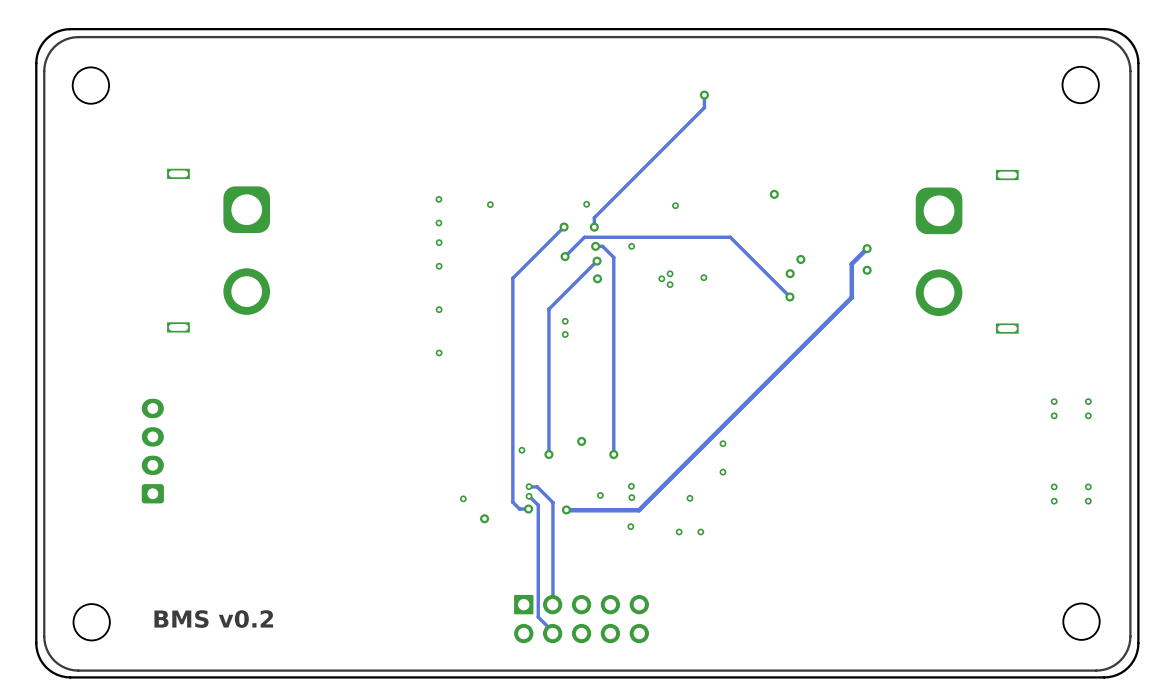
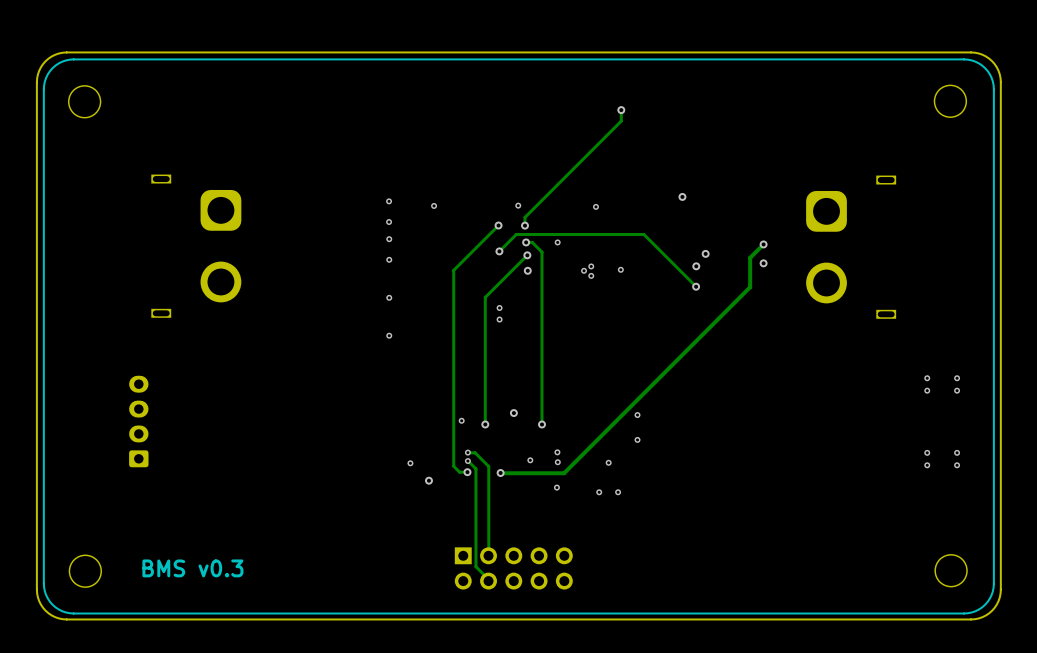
text: BMS v0.2 (213, 619) -> BMS v0.3 (192, 568)

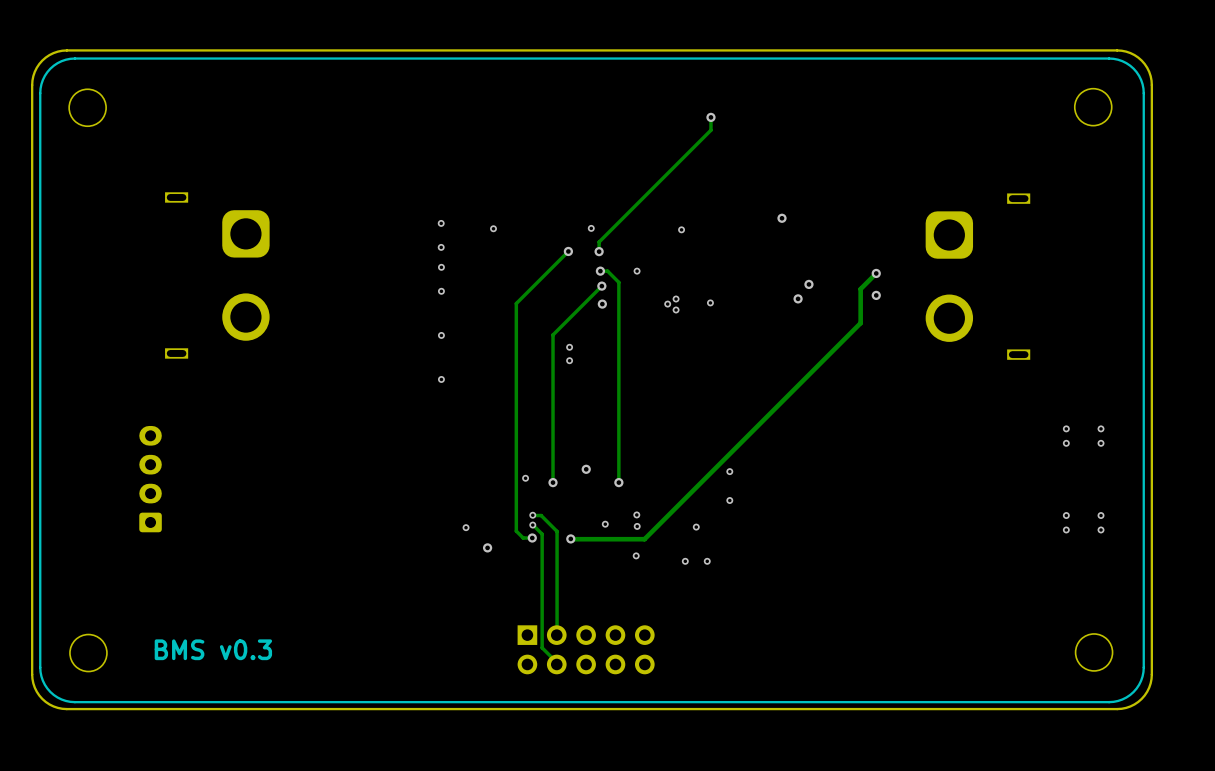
track: (499, 251) (516, 234) (643, 234) (696, 286) -> none
via: (499, 251) -> none
via: (696, 286) -> none

